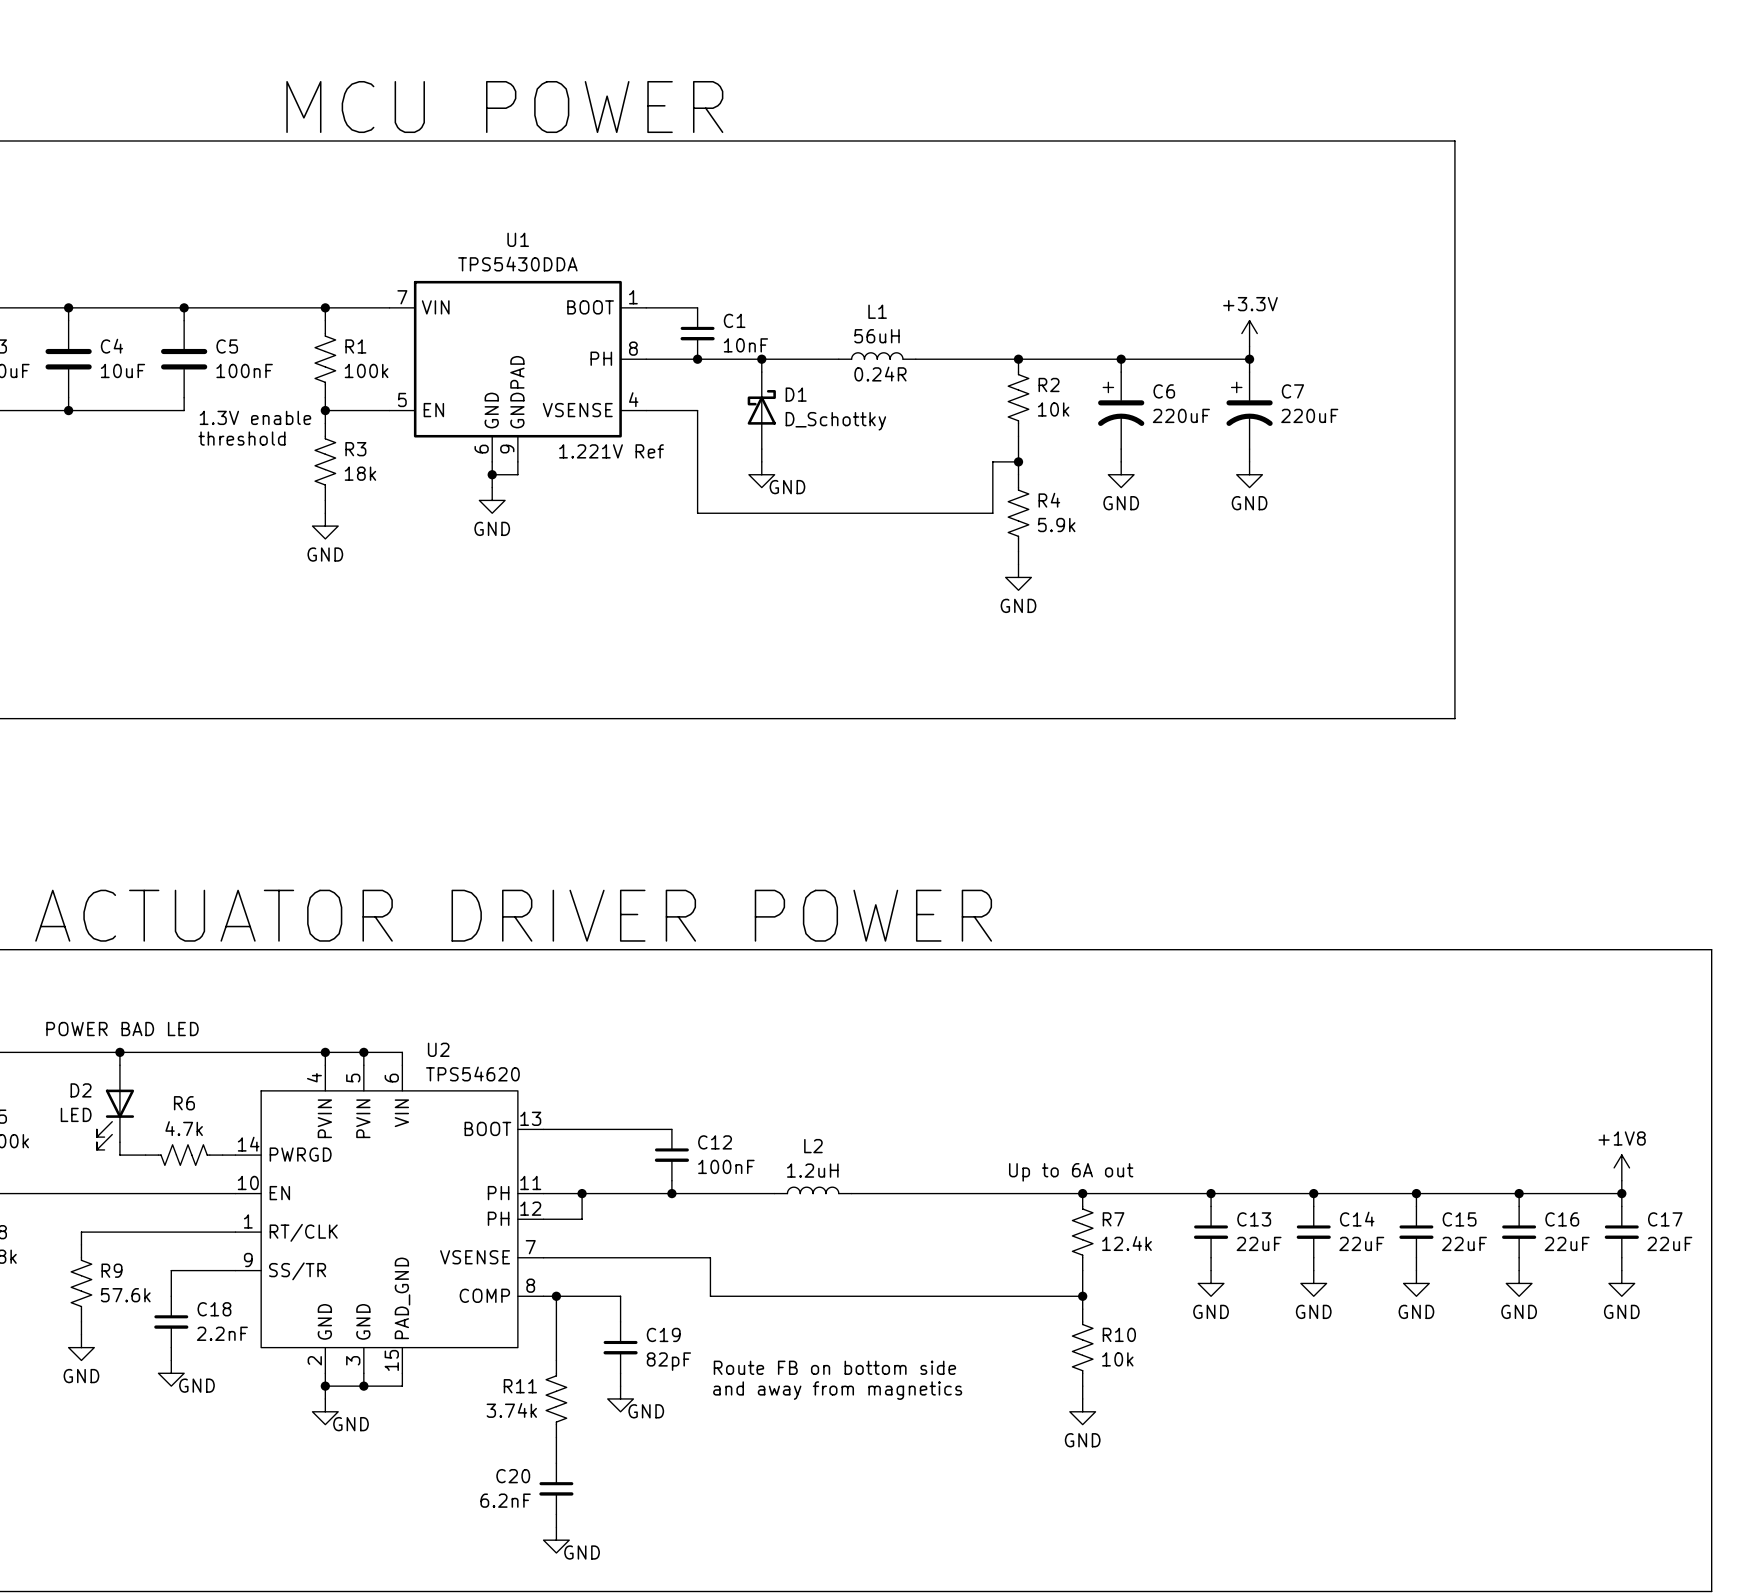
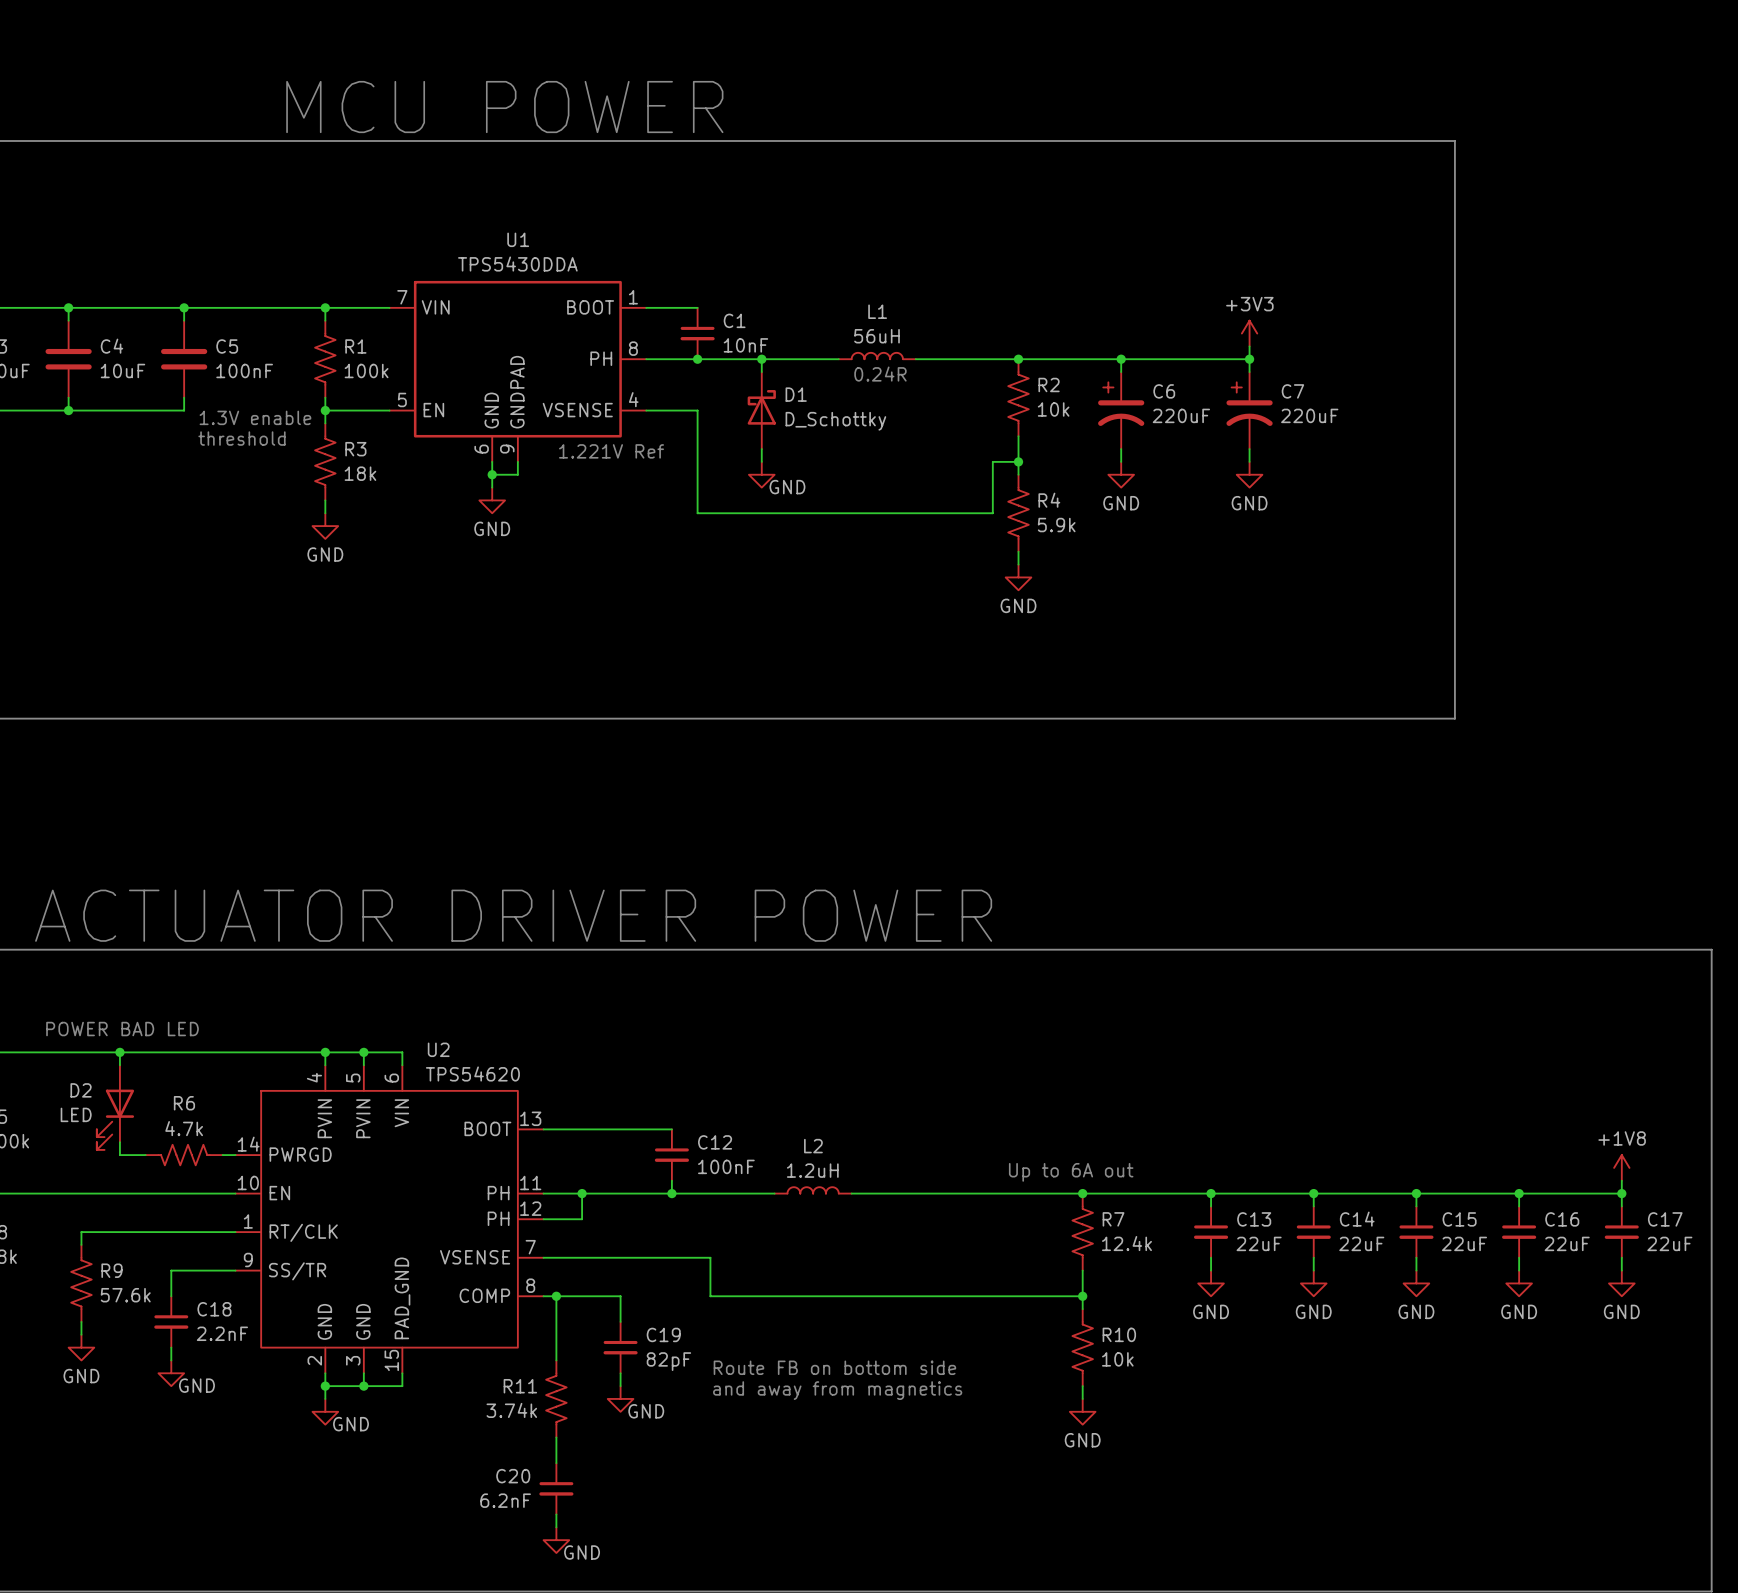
power symbol: +3.3V (1249, 333) -> +3V3 (1249, 333)

